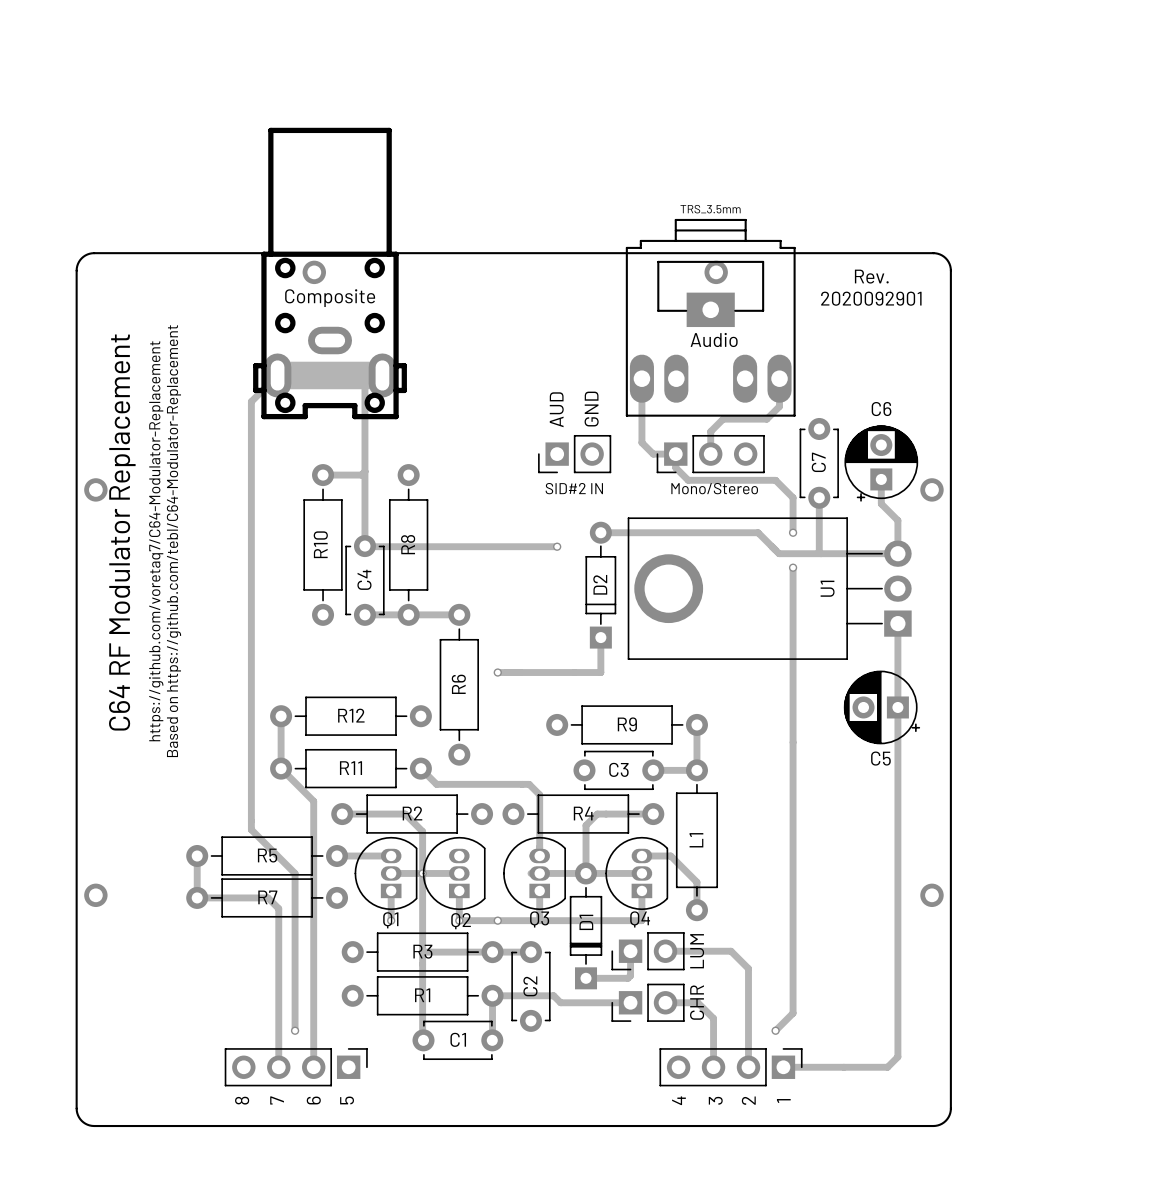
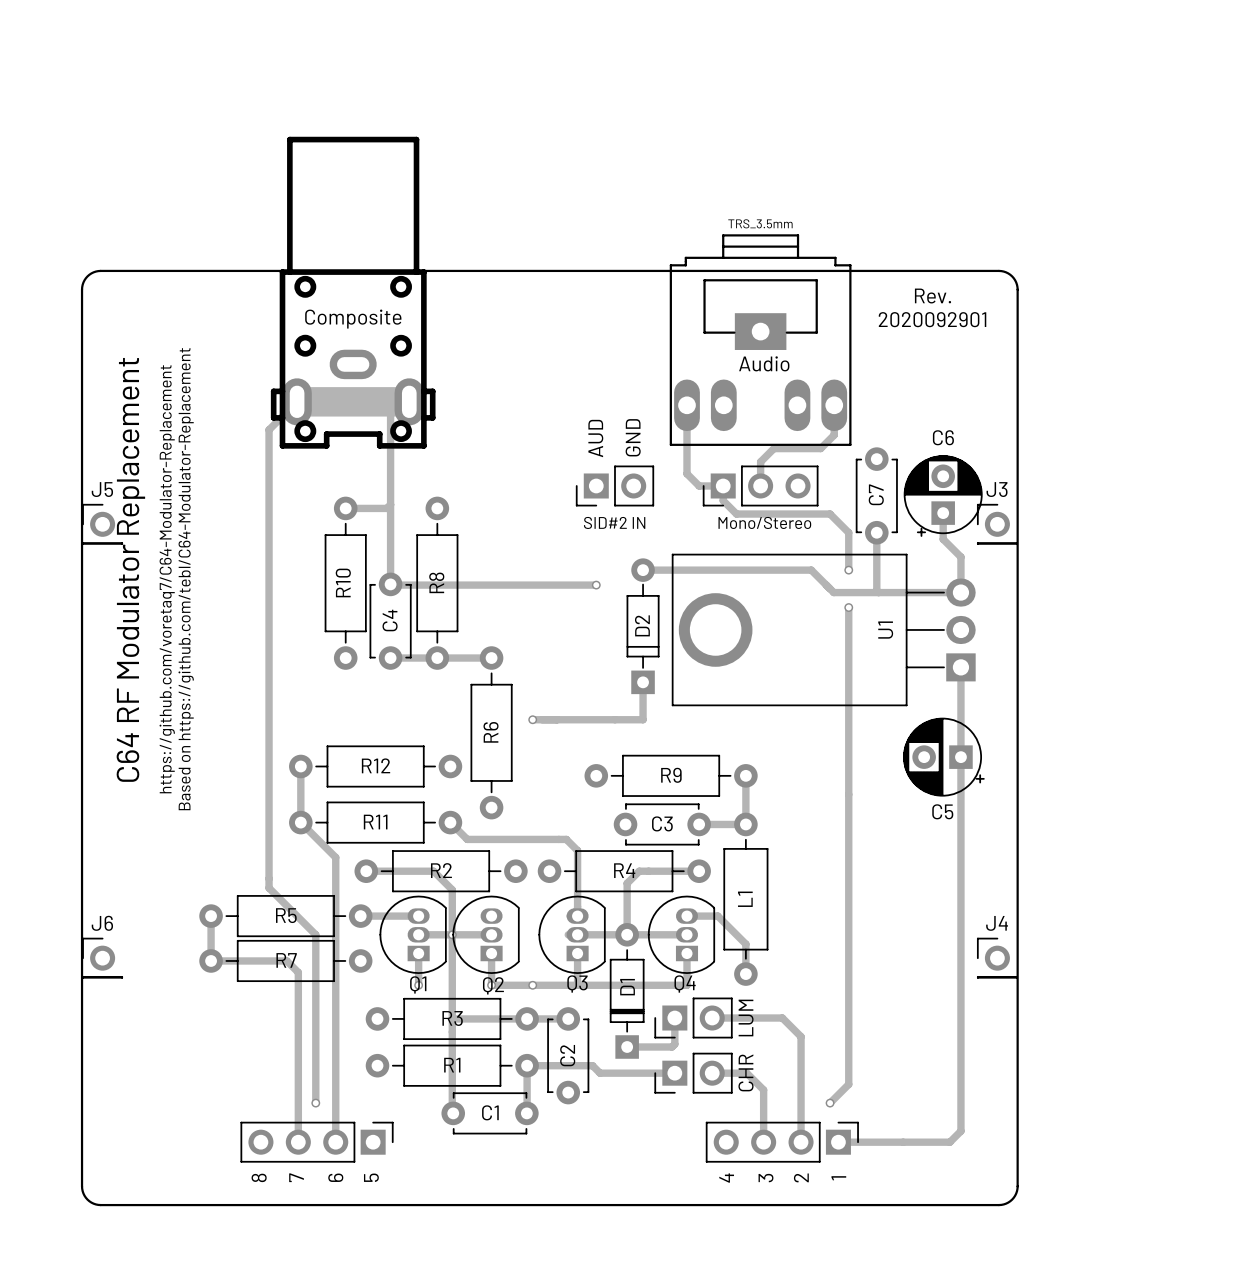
part: (314, 272) -> none
part: (716, 272) -> none
J5: none -> (102, 524)
J3: none -> (997, 524)
J6: none -> (102, 958)
J4: none -> (997, 958)

